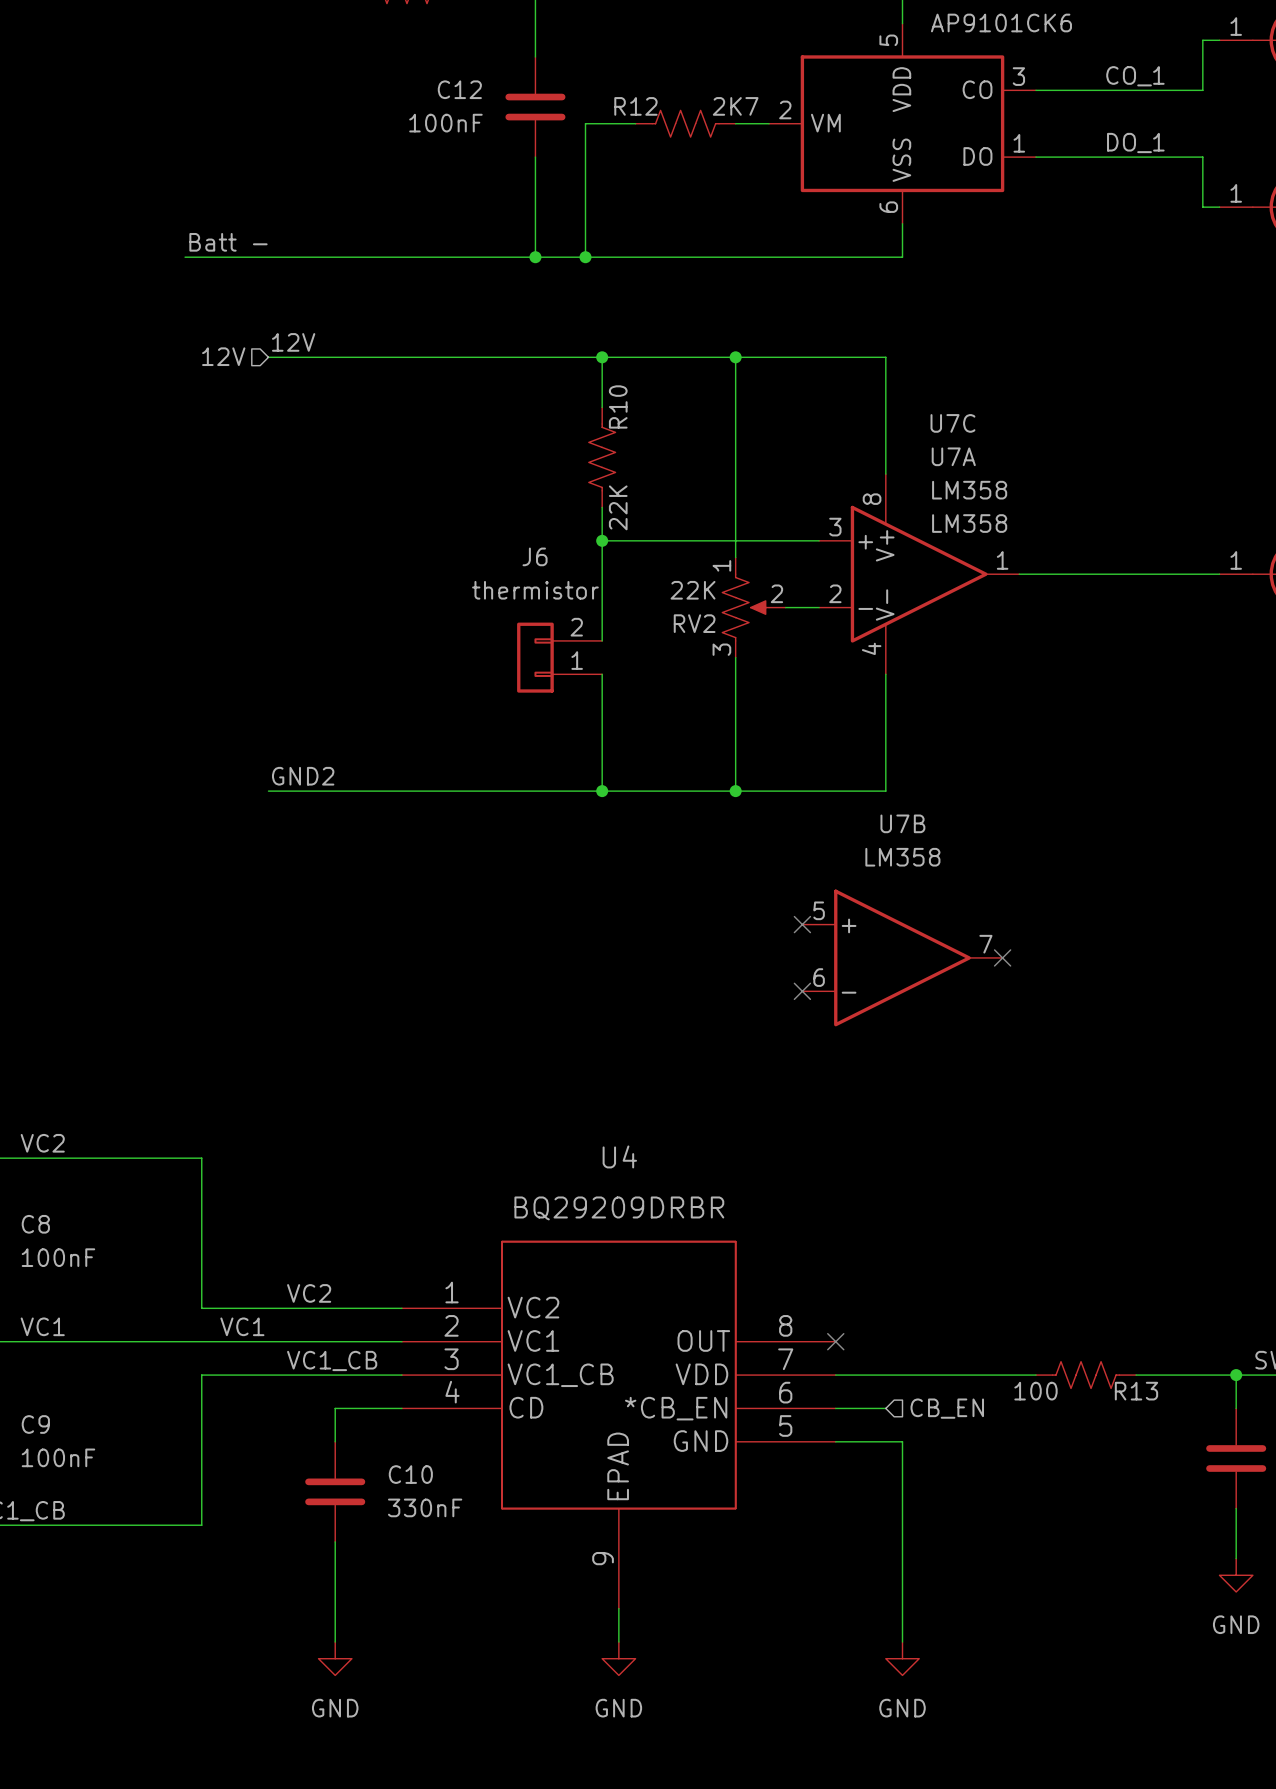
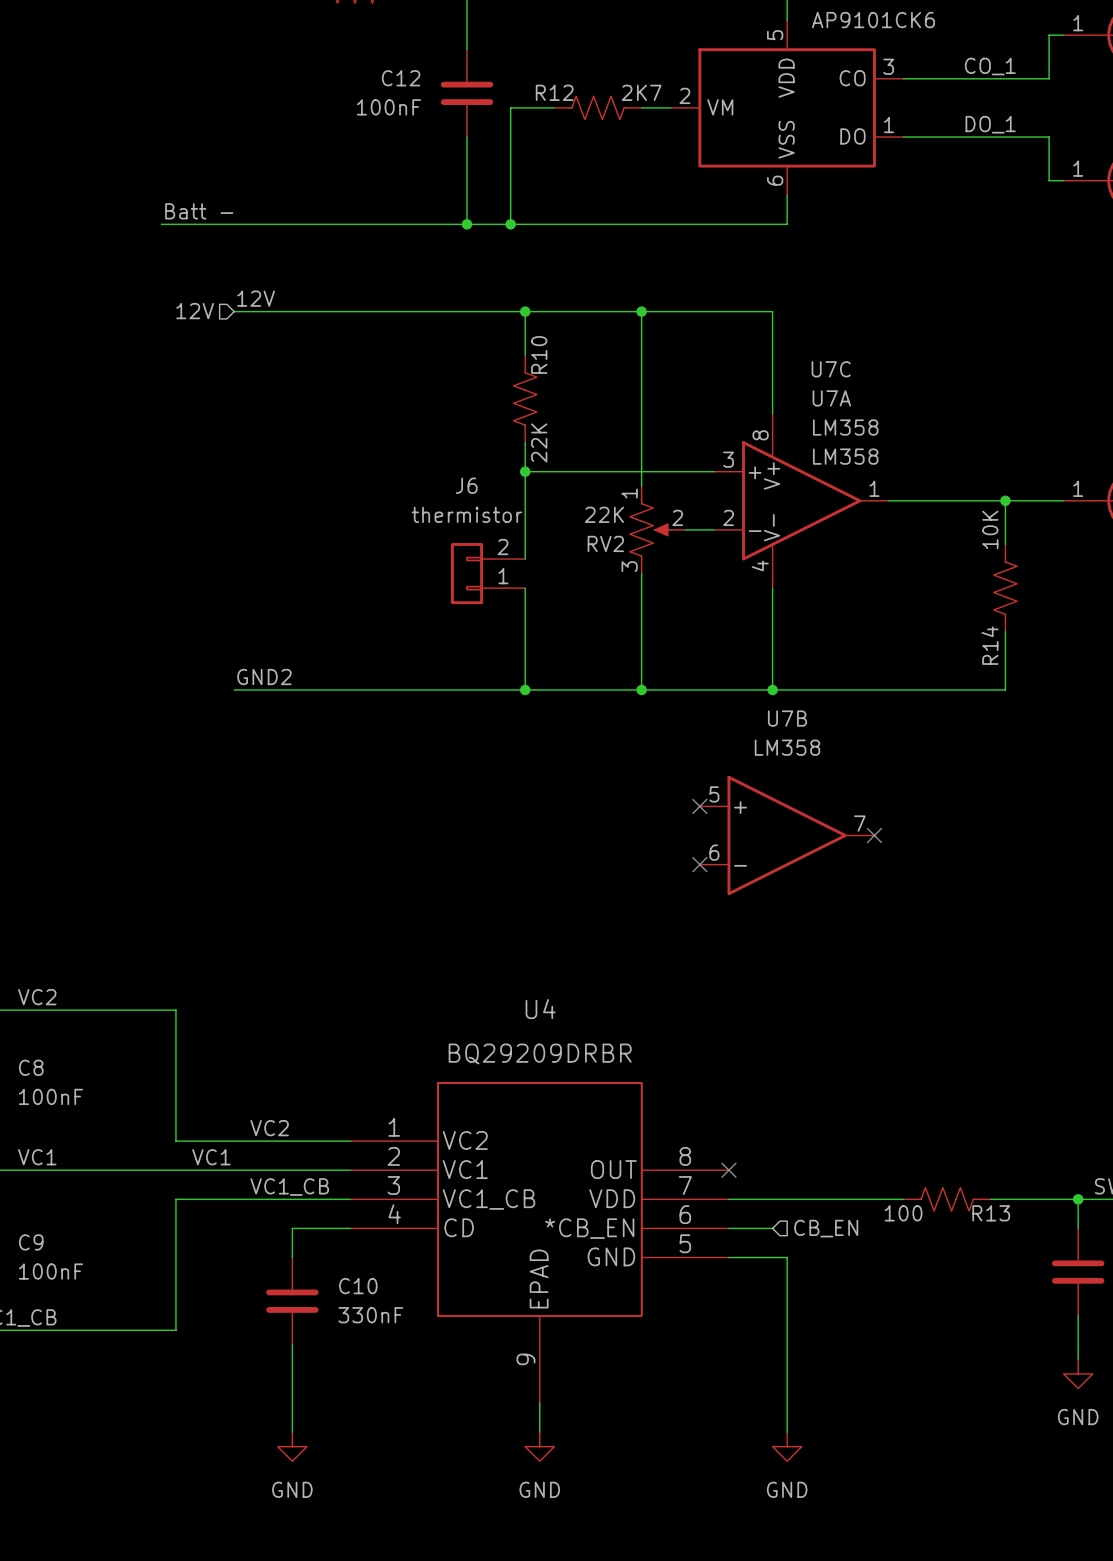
wire: none -> (1005, 500) (1005, 544)
junction: none -> (1005, 500)
R14: none -> 10K (1005, 588)
wire: none -> (1005, 631) (1005, 690) (772, 690)
junction: none -> (772, 690)

